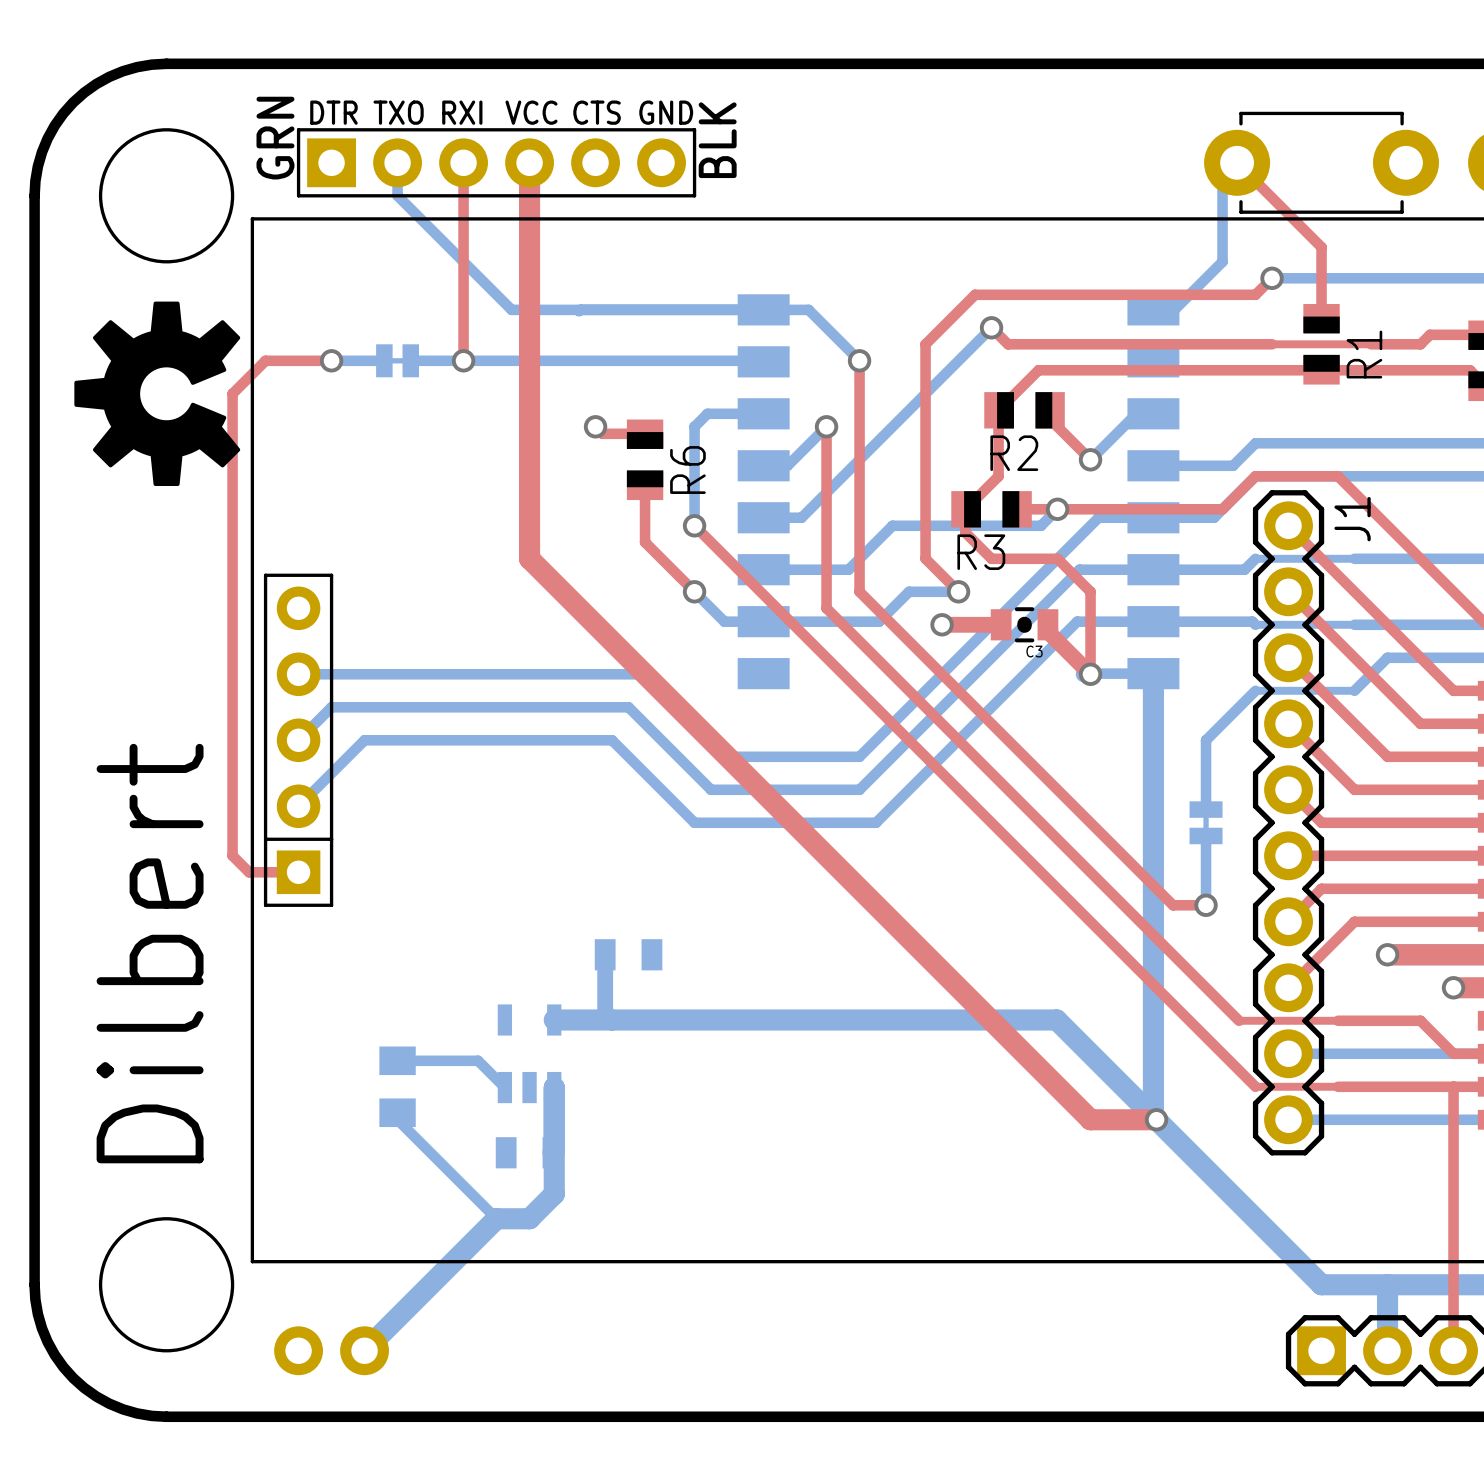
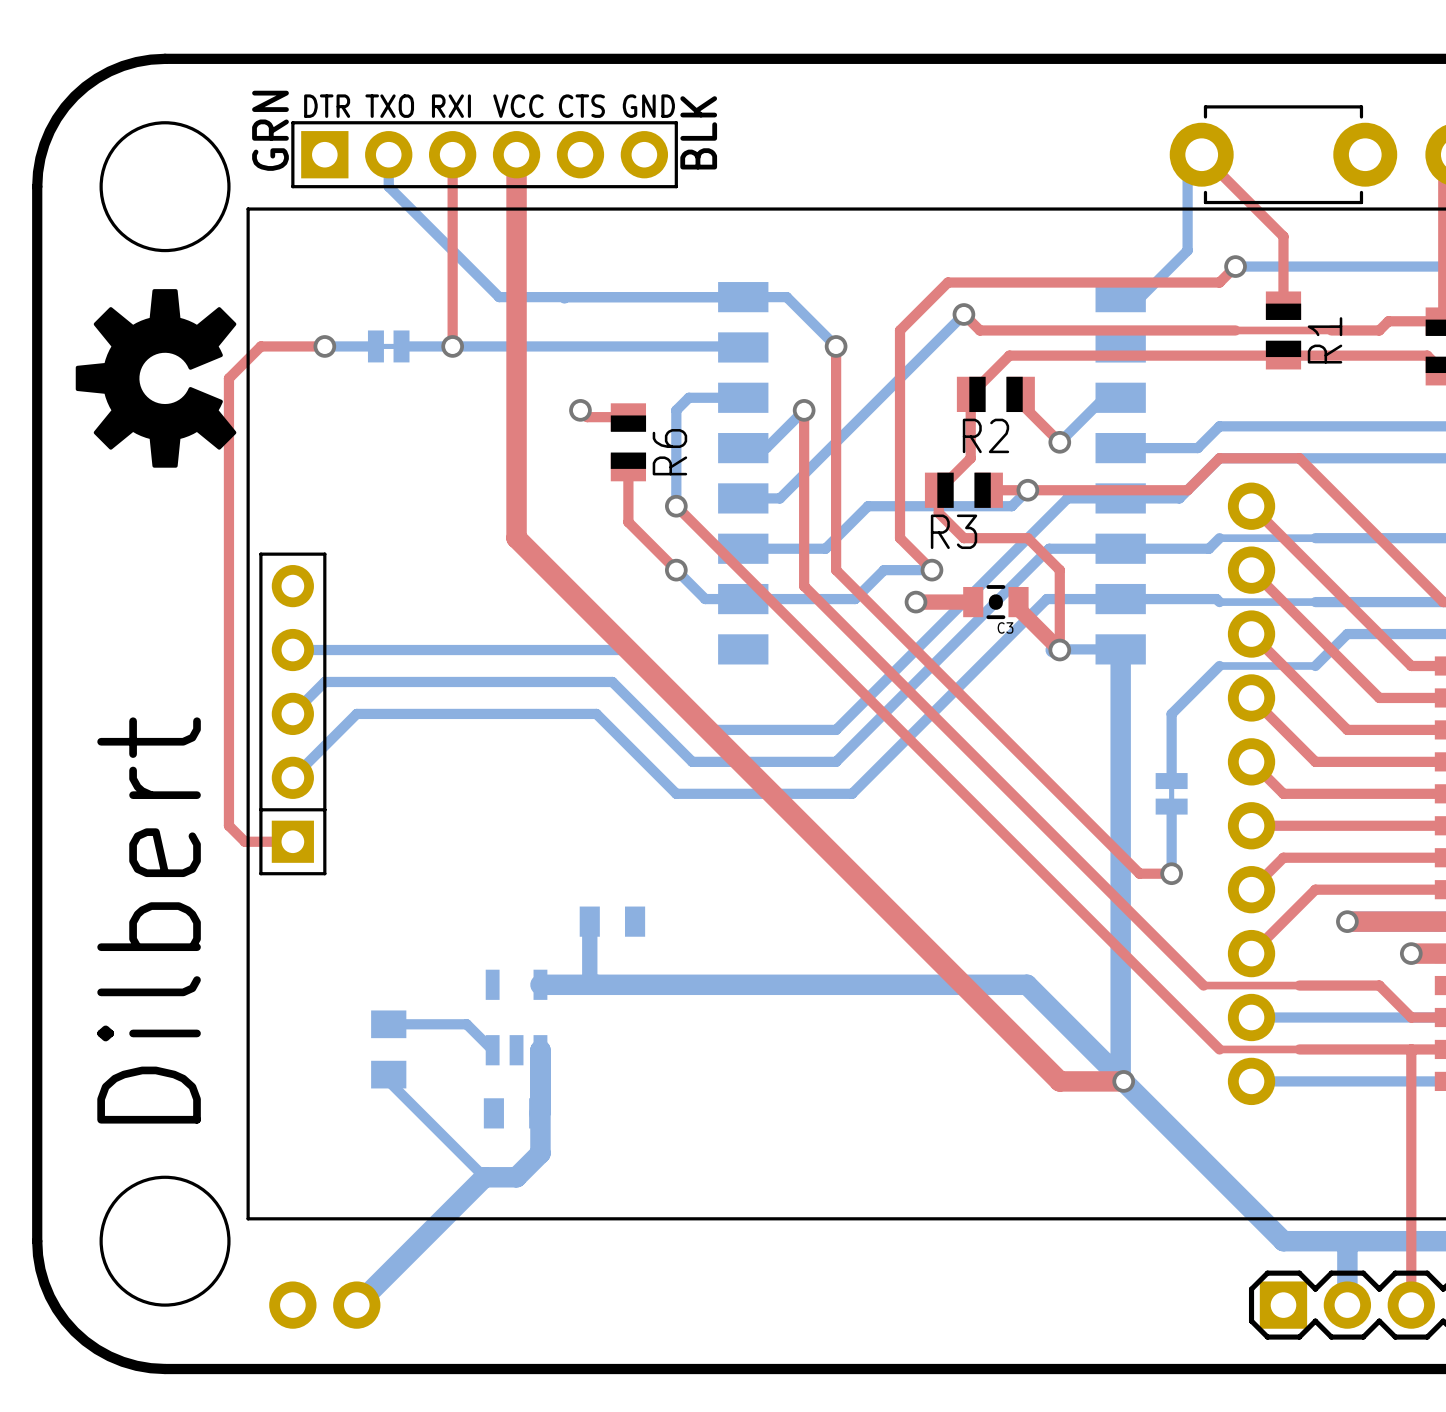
J1 side: top (1288, 822) -> bottom (1251, 793)

